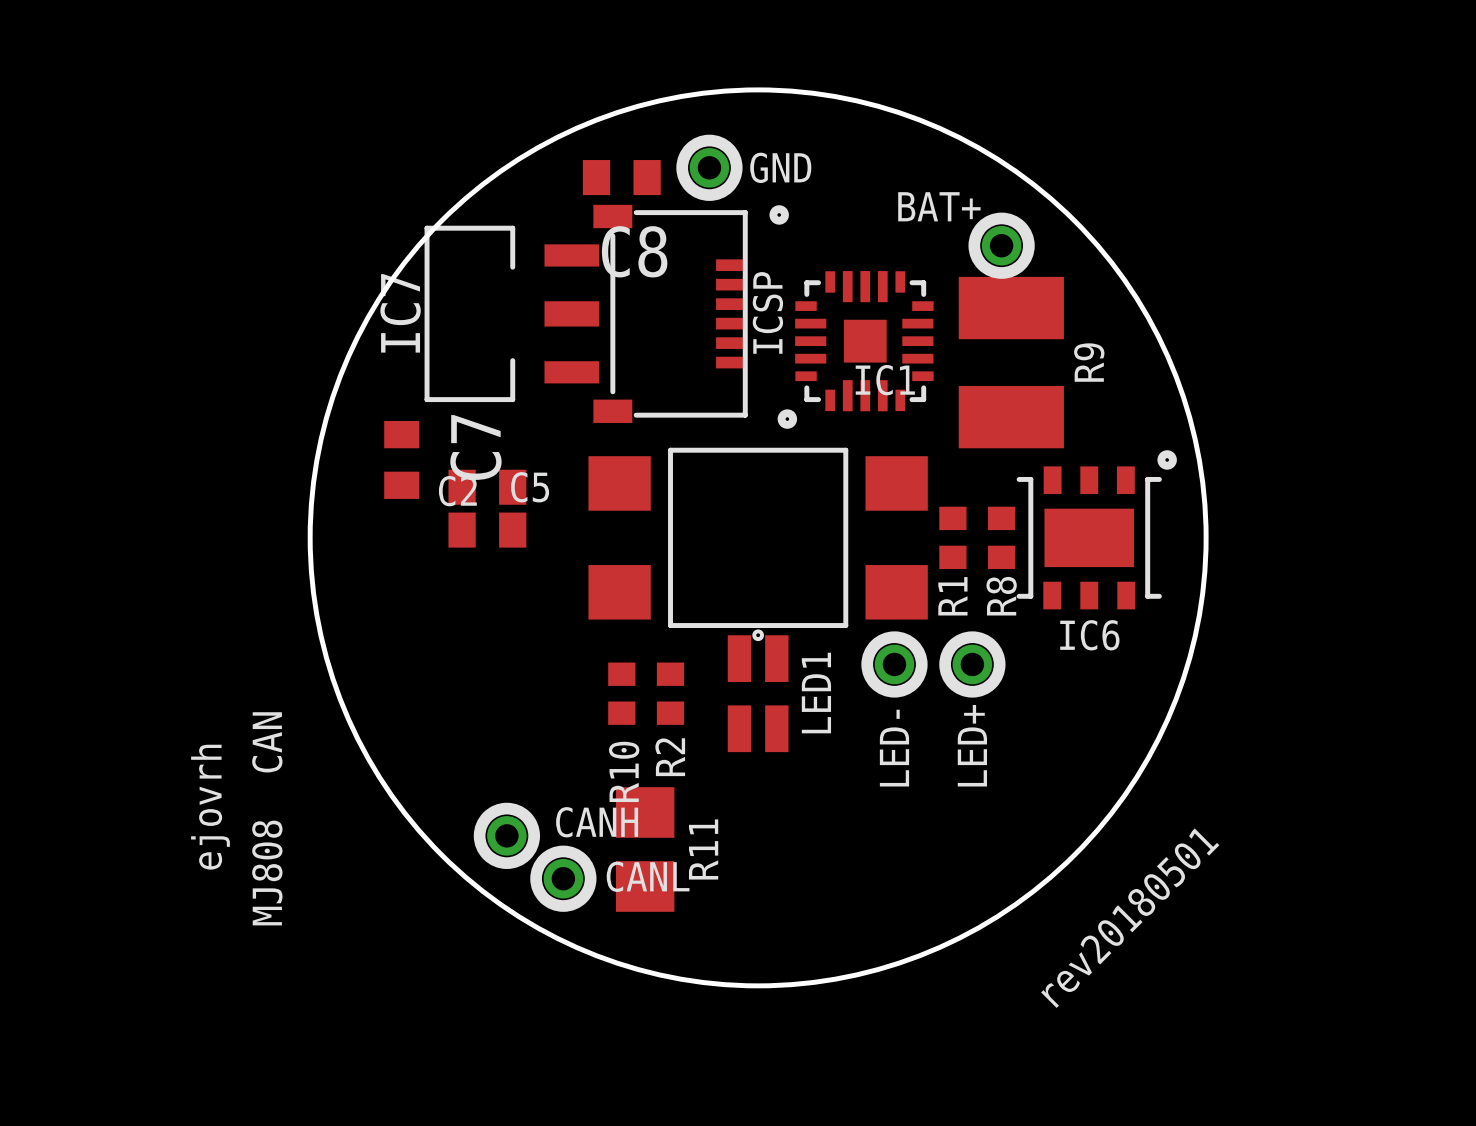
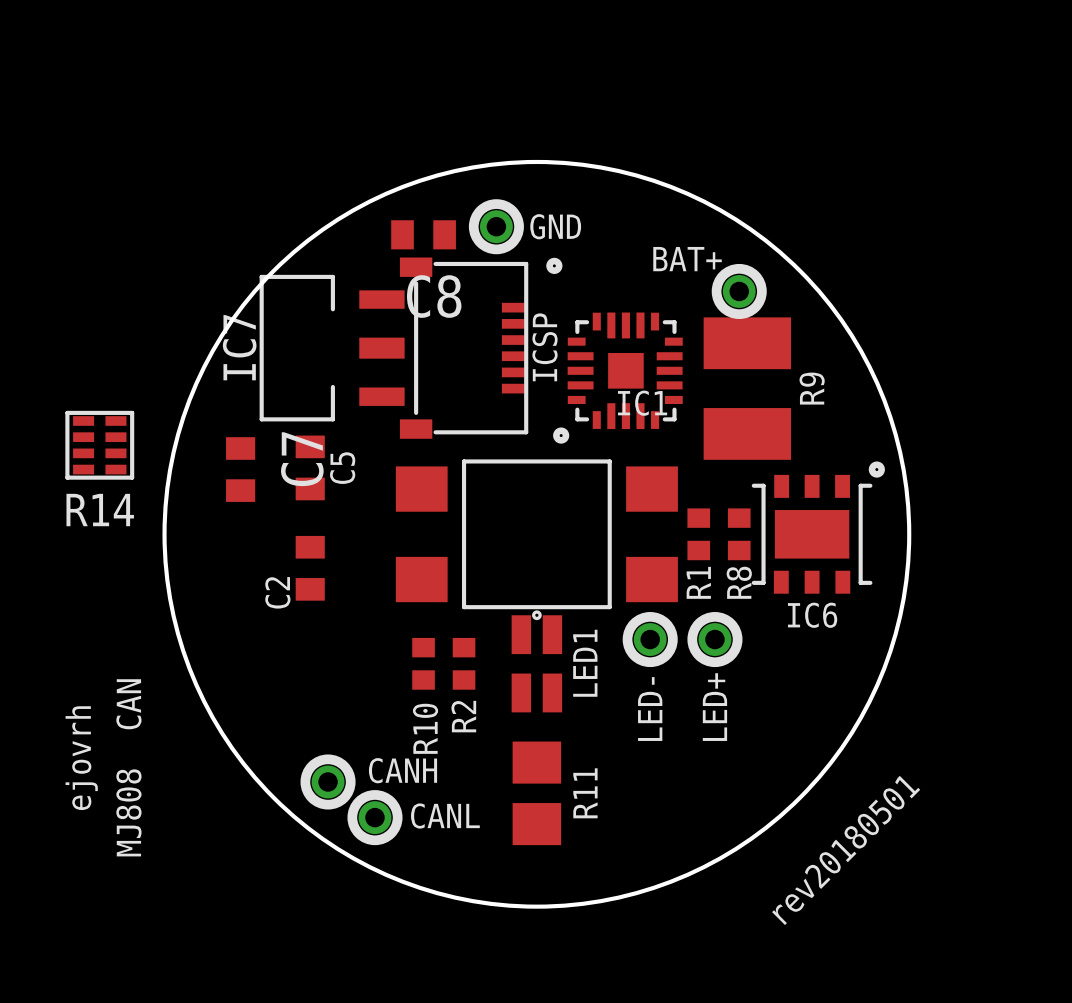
R14: none -> (99, 445)
C5 rotation: 0° (487, 487) -> 90° clockwise (310, 467)
C2 rotation: 0° (487, 530) -> 90° clockwise (310, 568)
C2 position: (487, 530) -> (310, 568)
R11 position: (645, 849) -> (536, 793)

